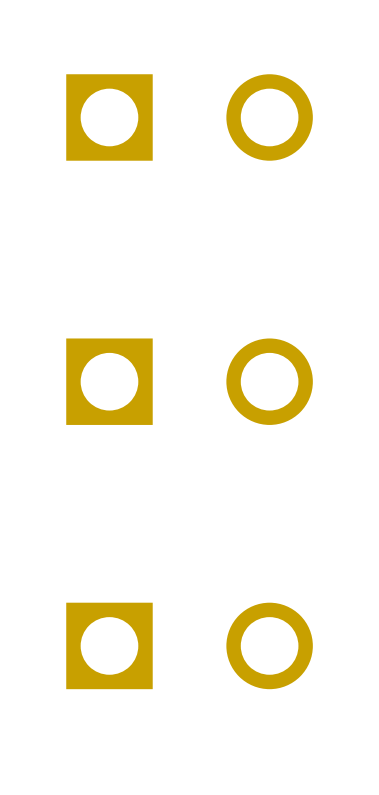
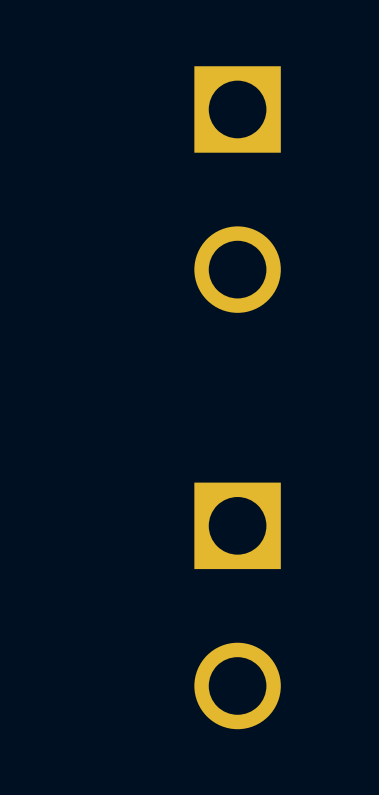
part rotation: 0° (189, 117) -> 90° clockwise (237, 189)
part: (189, 381) -> none
part rotation: 0° (189, 645) -> 90° clockwise (237, 605)

